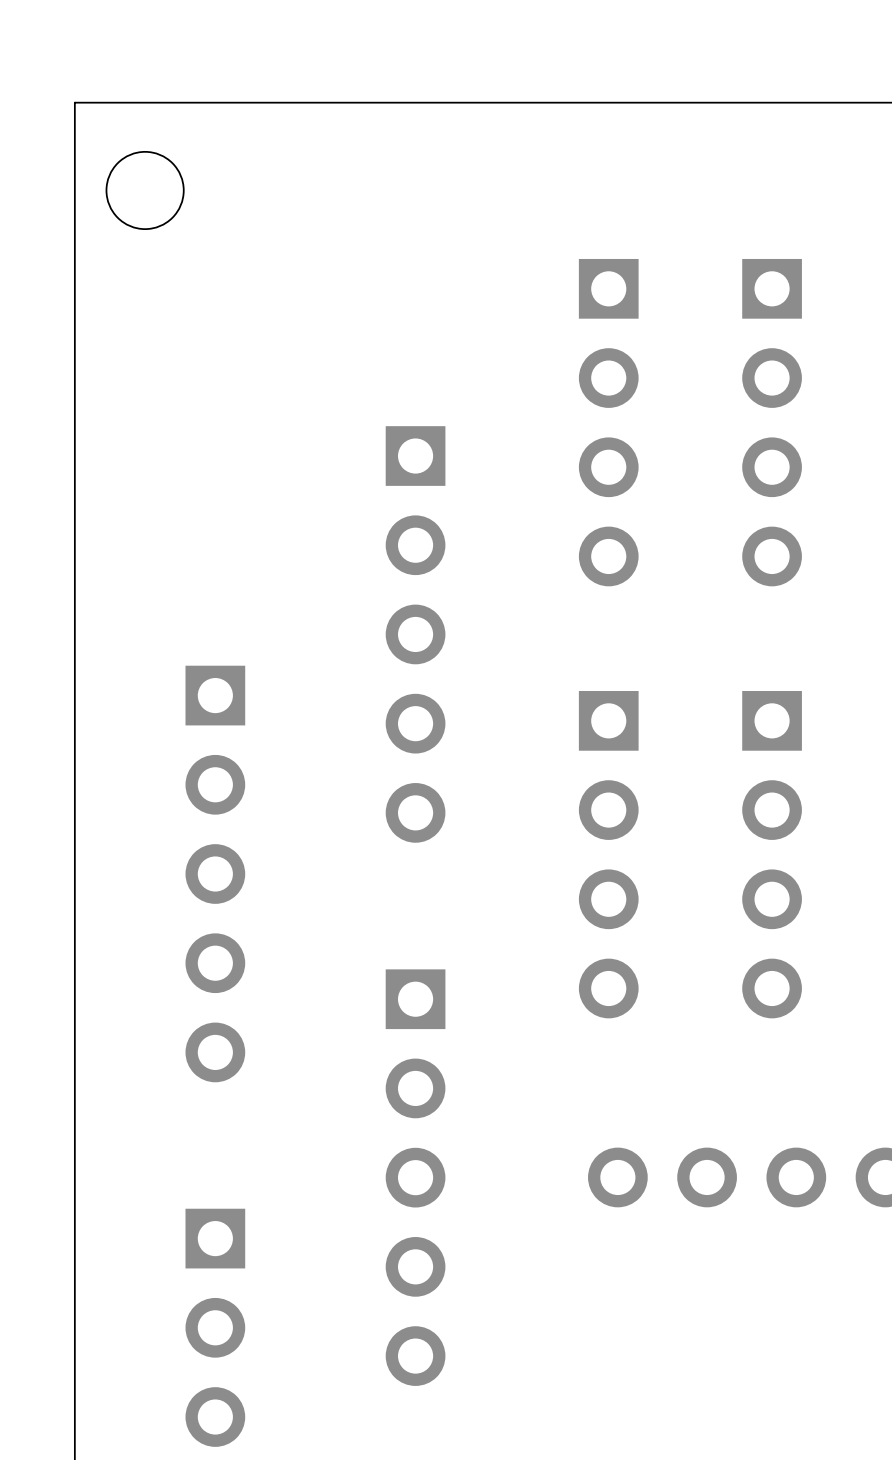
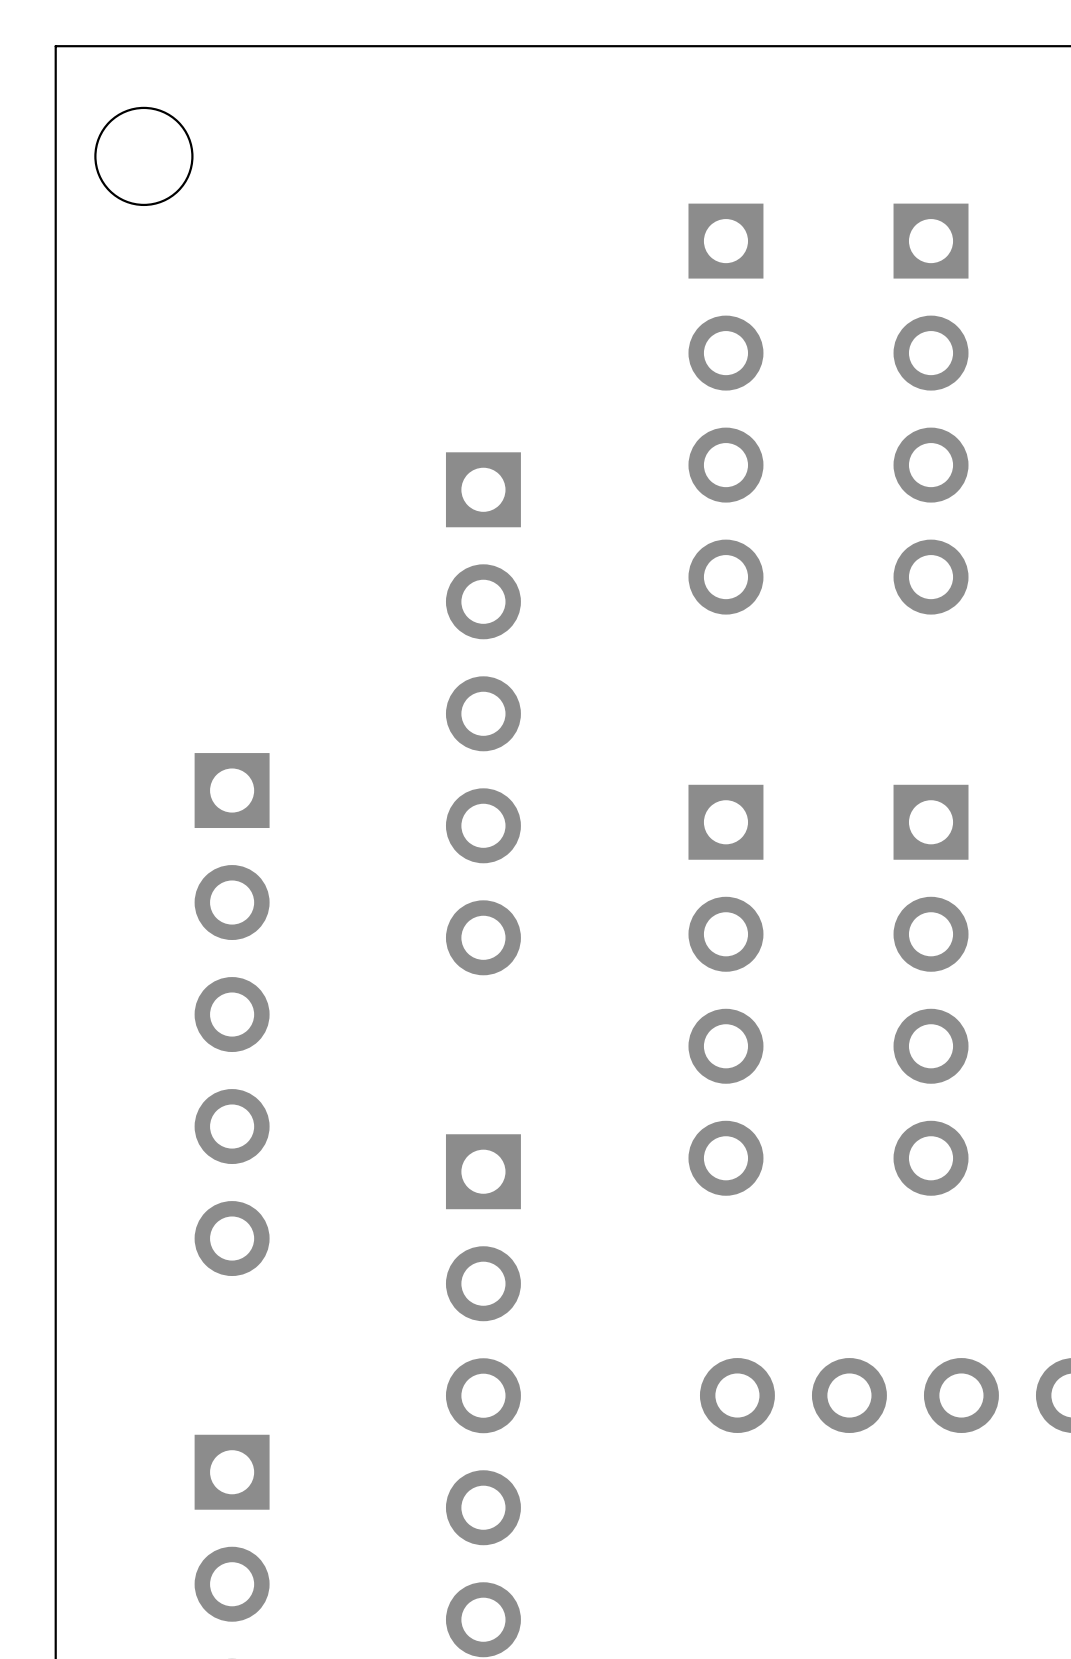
part position: (608, 422) -> (725, 409)
part position: (772, 422) -> (931, 409)

